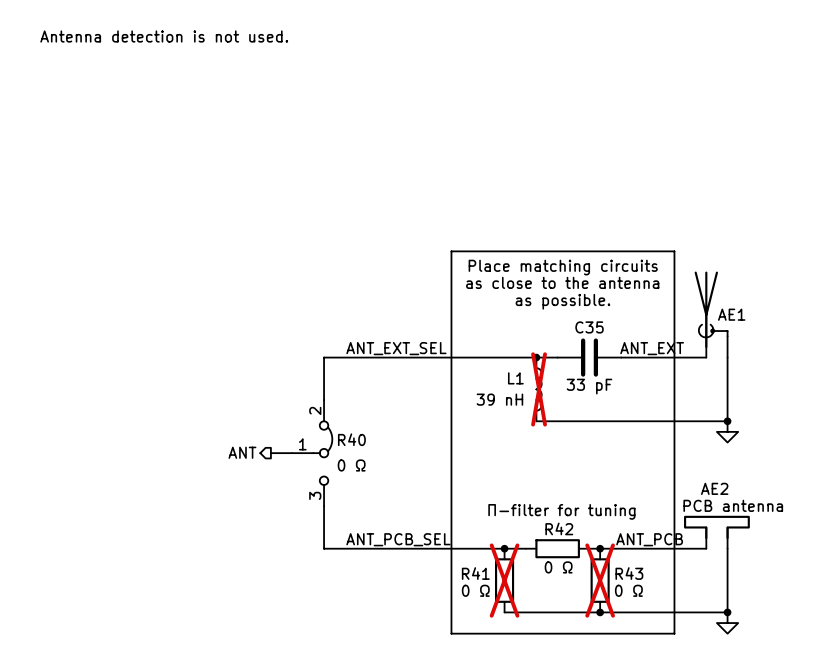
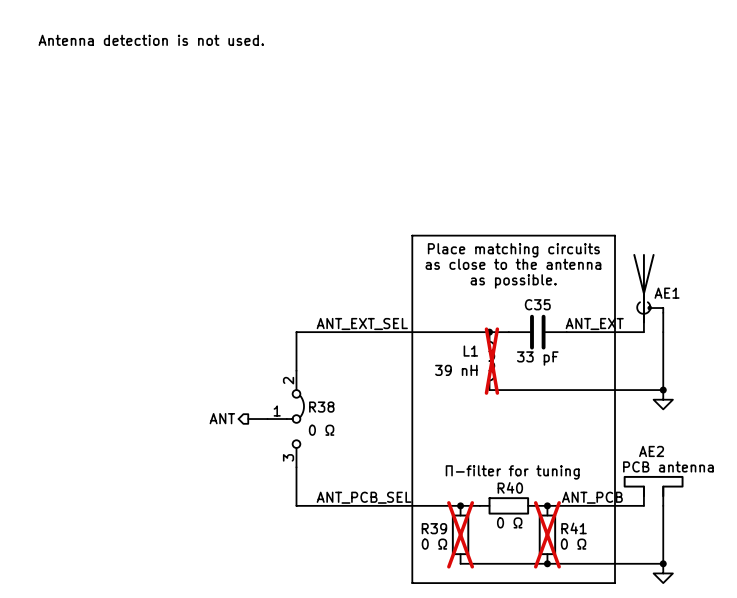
R40 name: R40 (351, 439) -> R38 (321, 407)
R42 name: R42 (559, 528) -> R40 (510, 487)
R41 name: R41 (475, 573) -> R39 (434, 528)
R43 name: R43 (629, 573) -> R41 (574, 528)

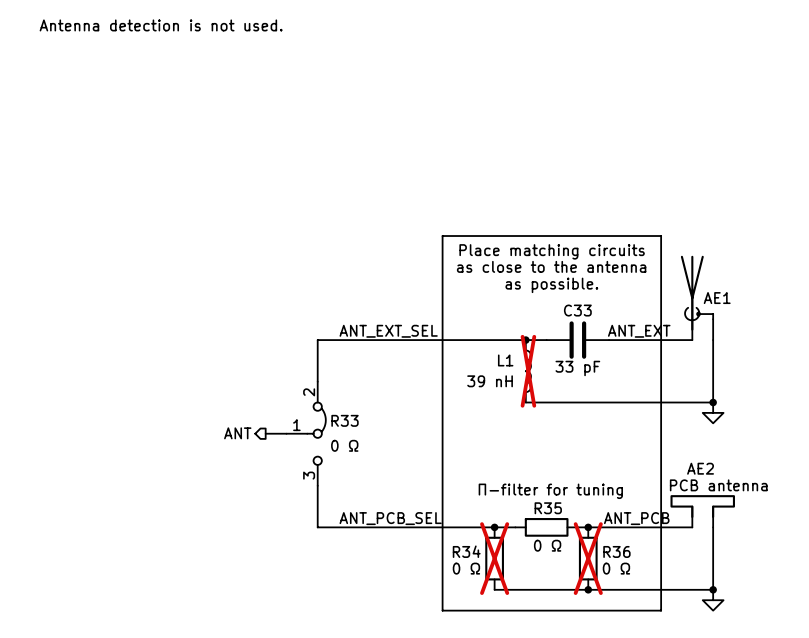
C35 name: C35 (537, 304) -> C33 (577, 310)
R38 name: R38 (321, 407) -> R33 (345, 420)
R40 name: R40 (510, 487) -> R35 (548, 508)
R39 name: R39 (434, 528) -> R34 (466, 551)
R41 name: R41 (574, 528) -> R36 (616, 551)

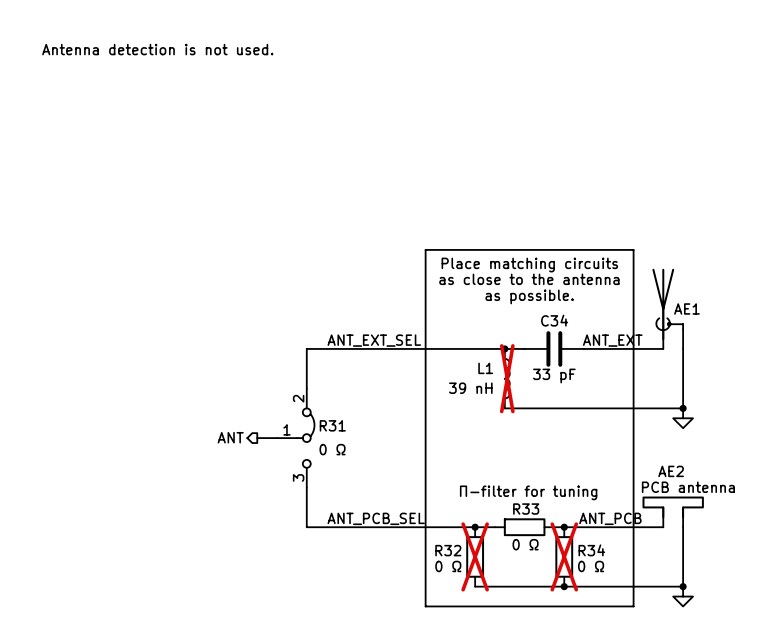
C33 name: C33 (577, 310) -> C34 (554, 320)
R33 name: R33 (345, 420) -> R31 (332, 425)
R35 name: R35 (548, 508) -> R33 (526, 509)
R34 name: R34 (466, 551) -> R32 (448, 550)
R36 name: R36 (616, 551) -> R34 (591, 550)

